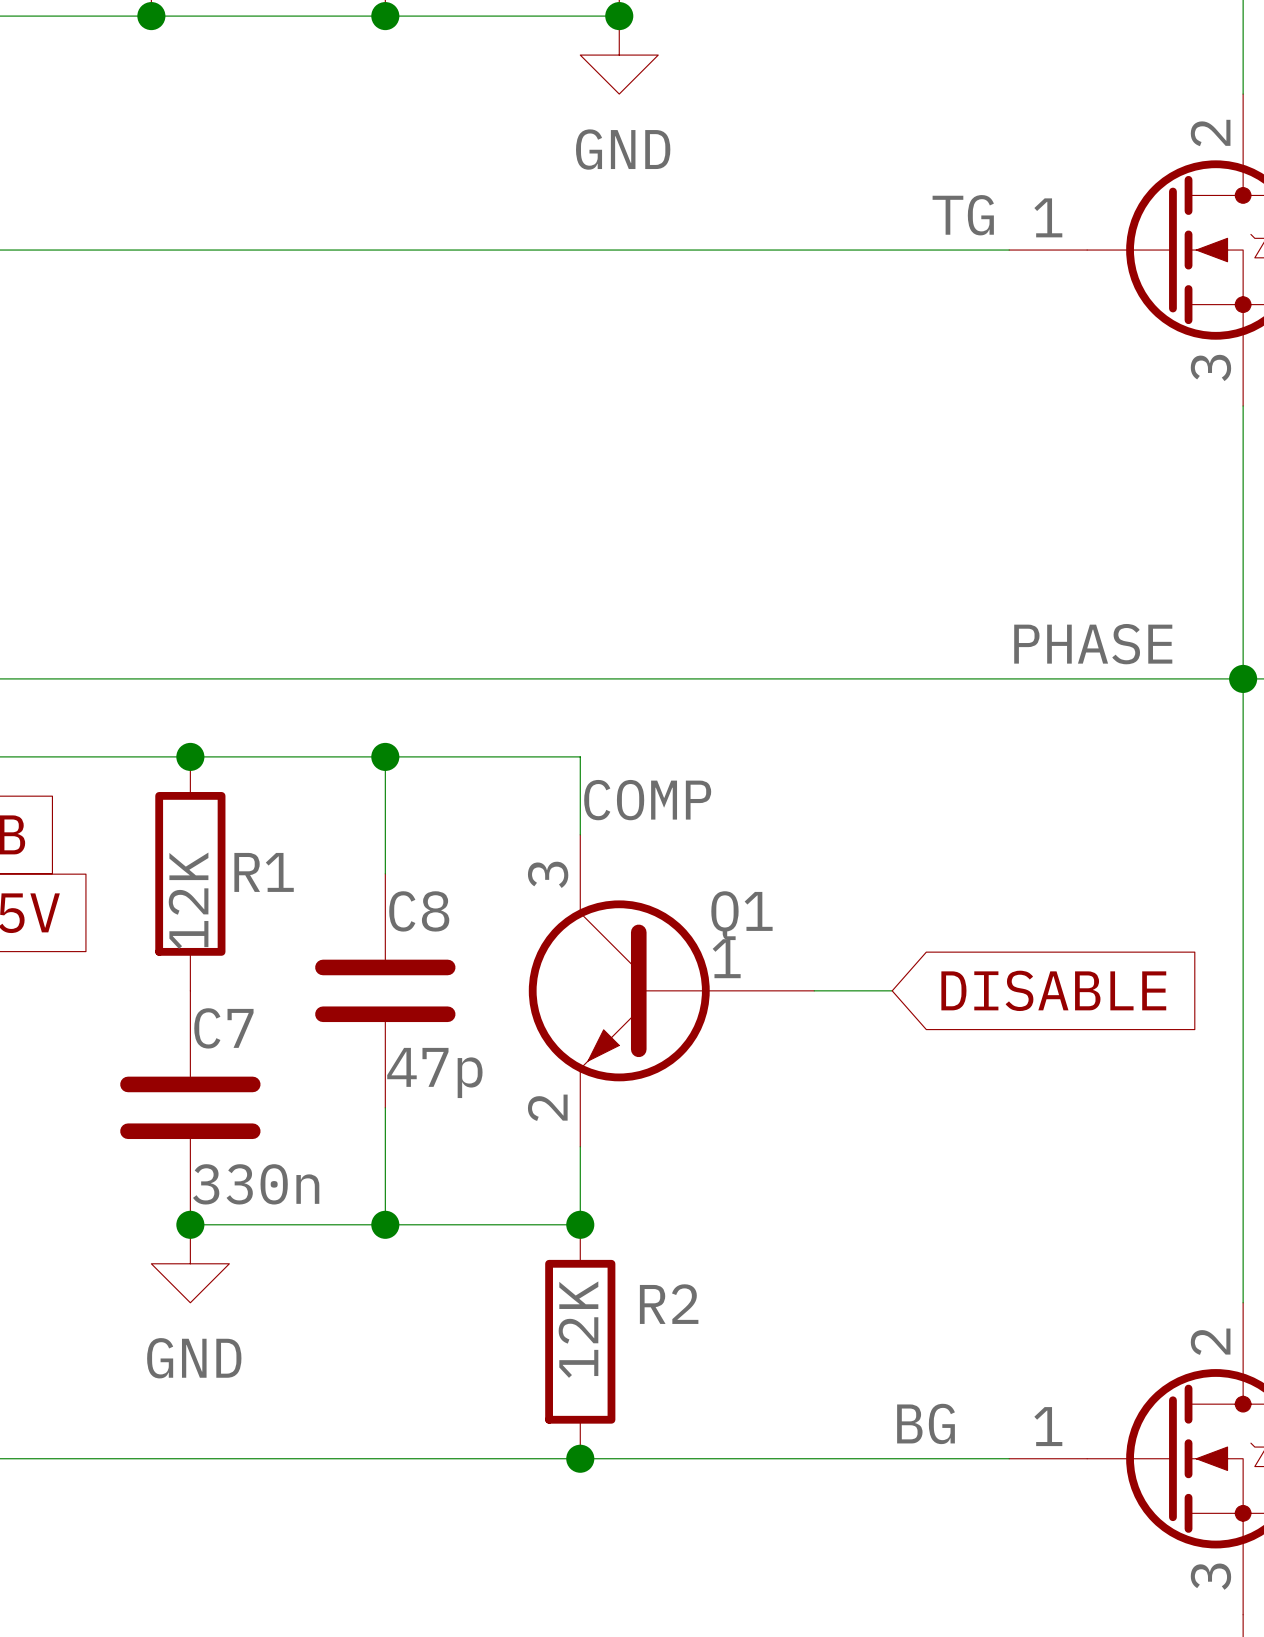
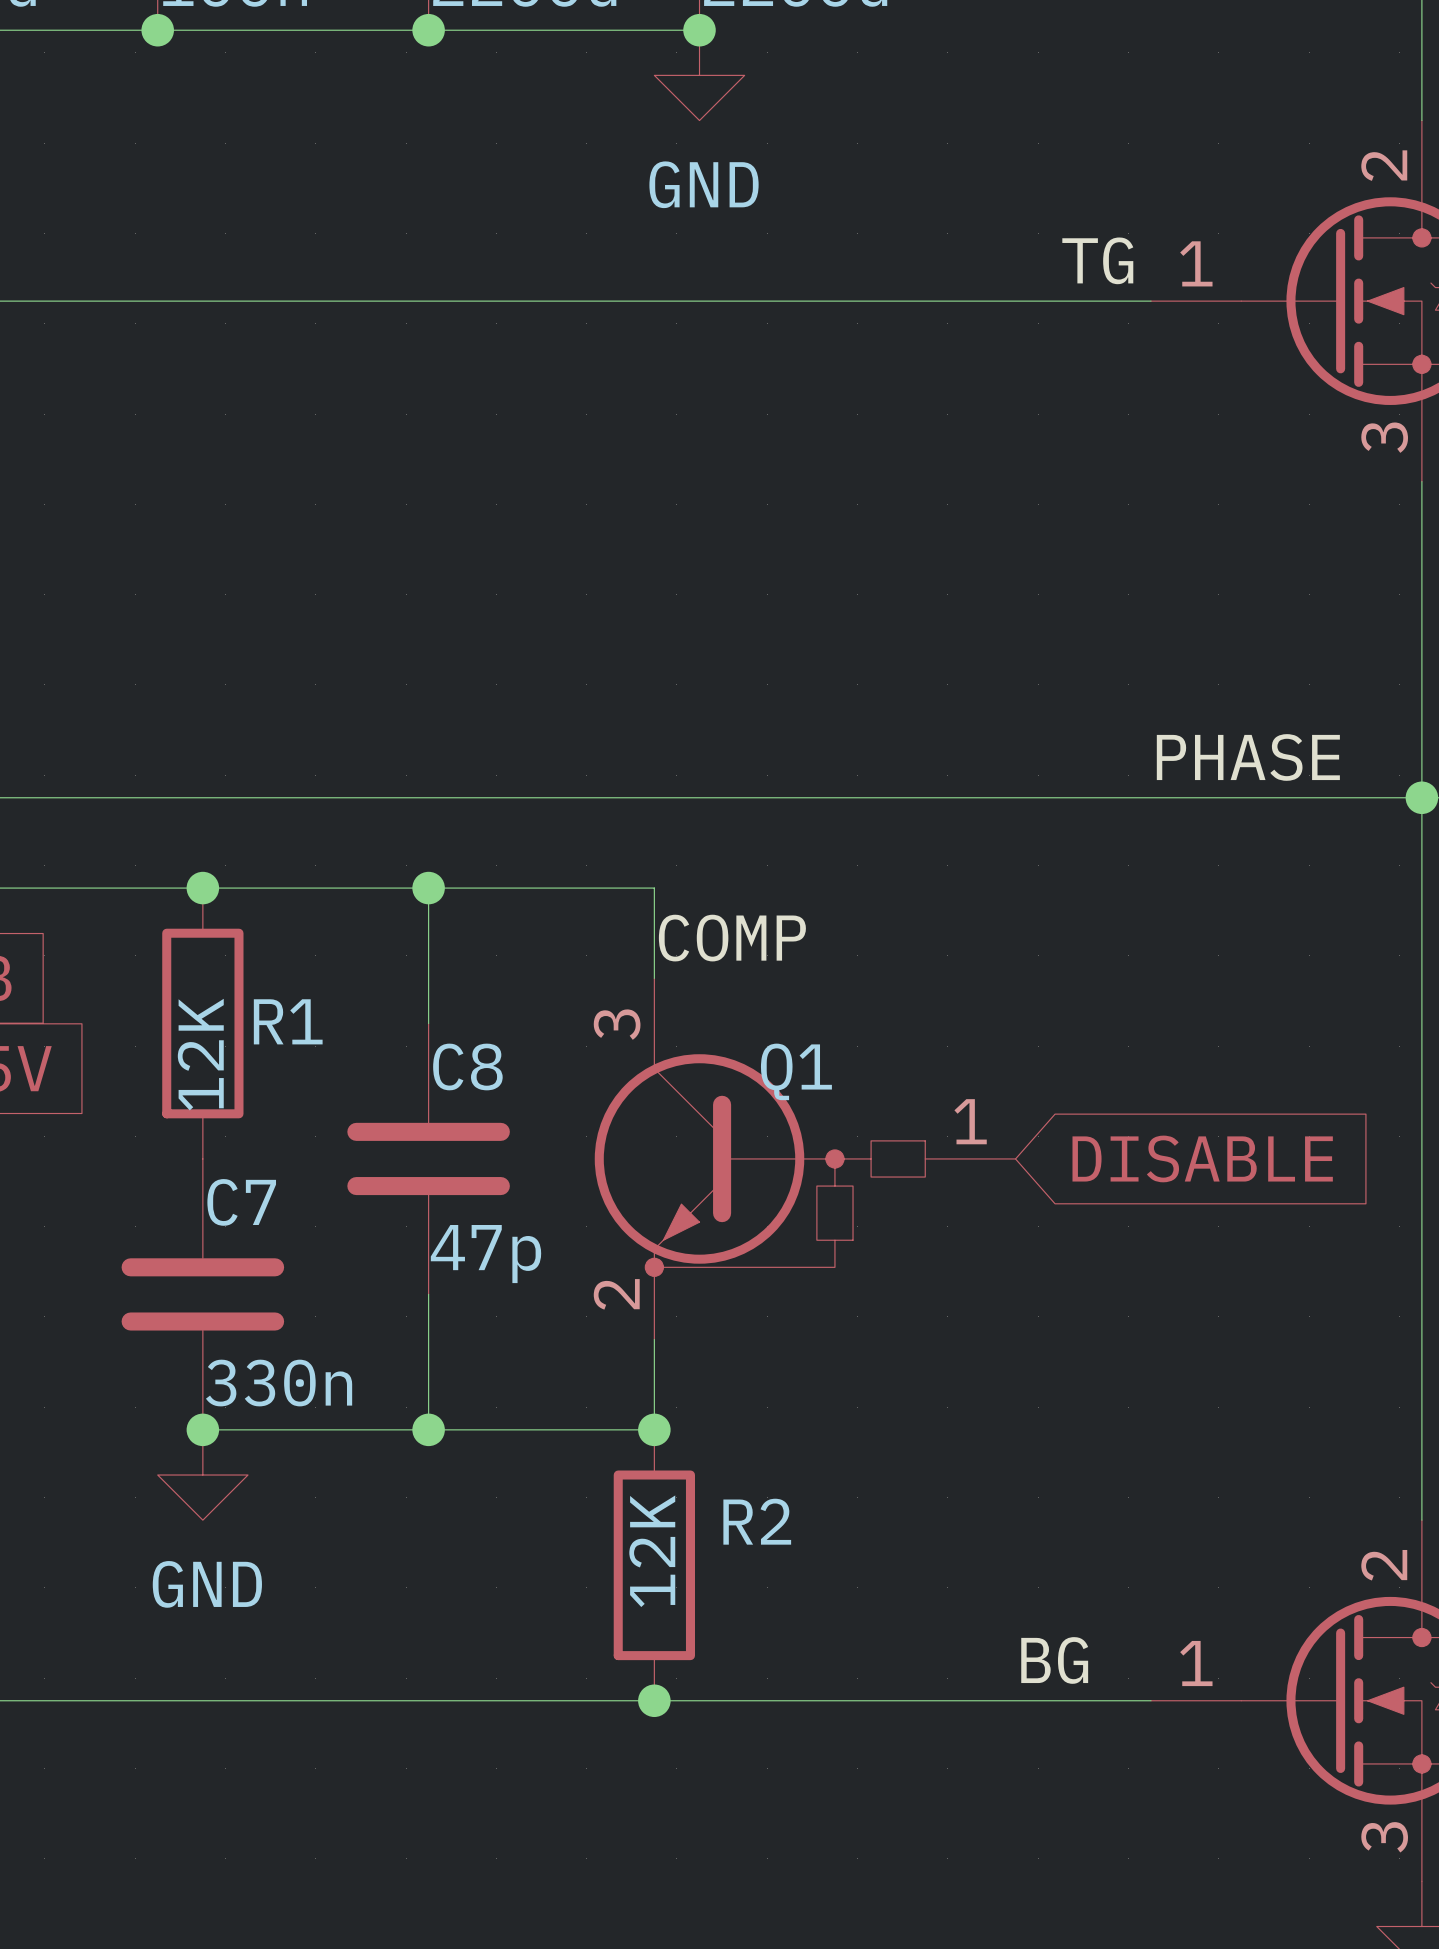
Q1 symbol: [528, 834, 815, 1147] -> [594, 978, 1016, 1340]
Q1 name position: Q1 (741, 915) -> Q1 (796, 1071)

